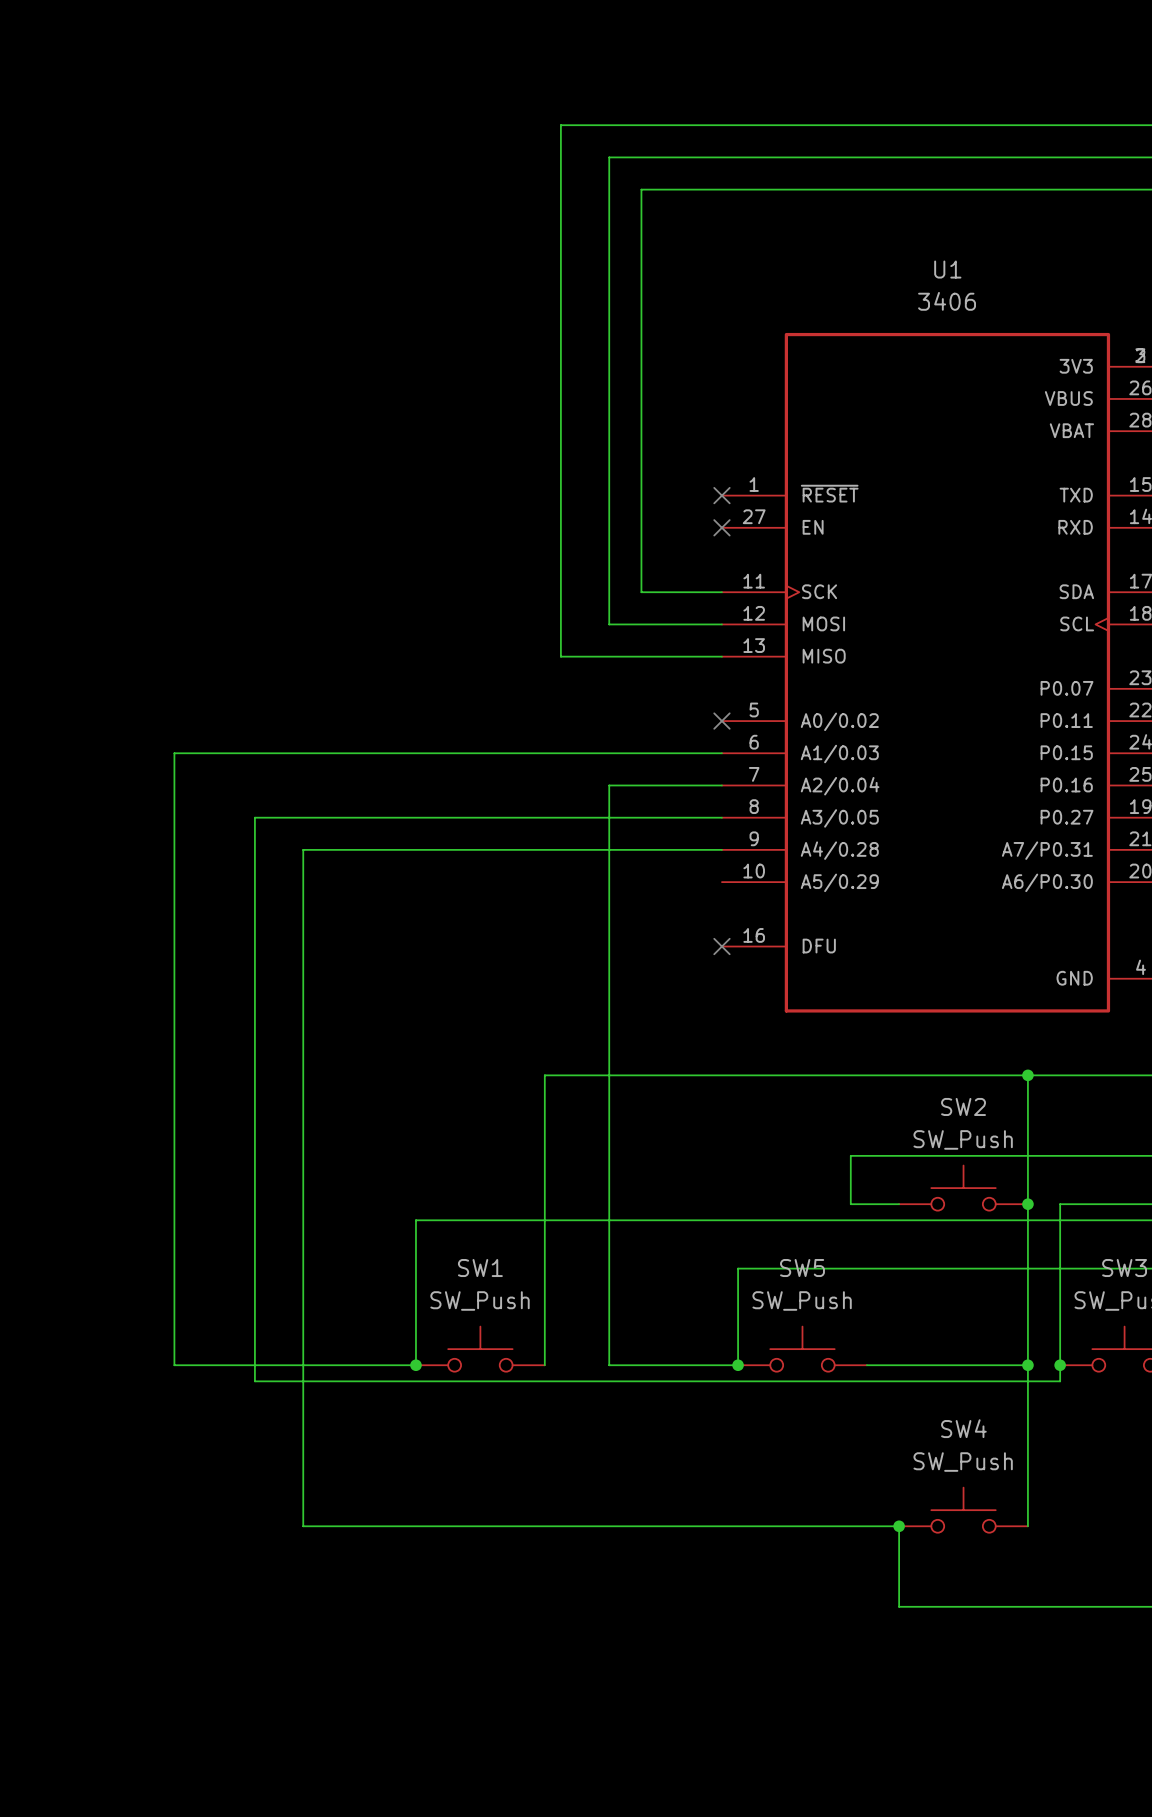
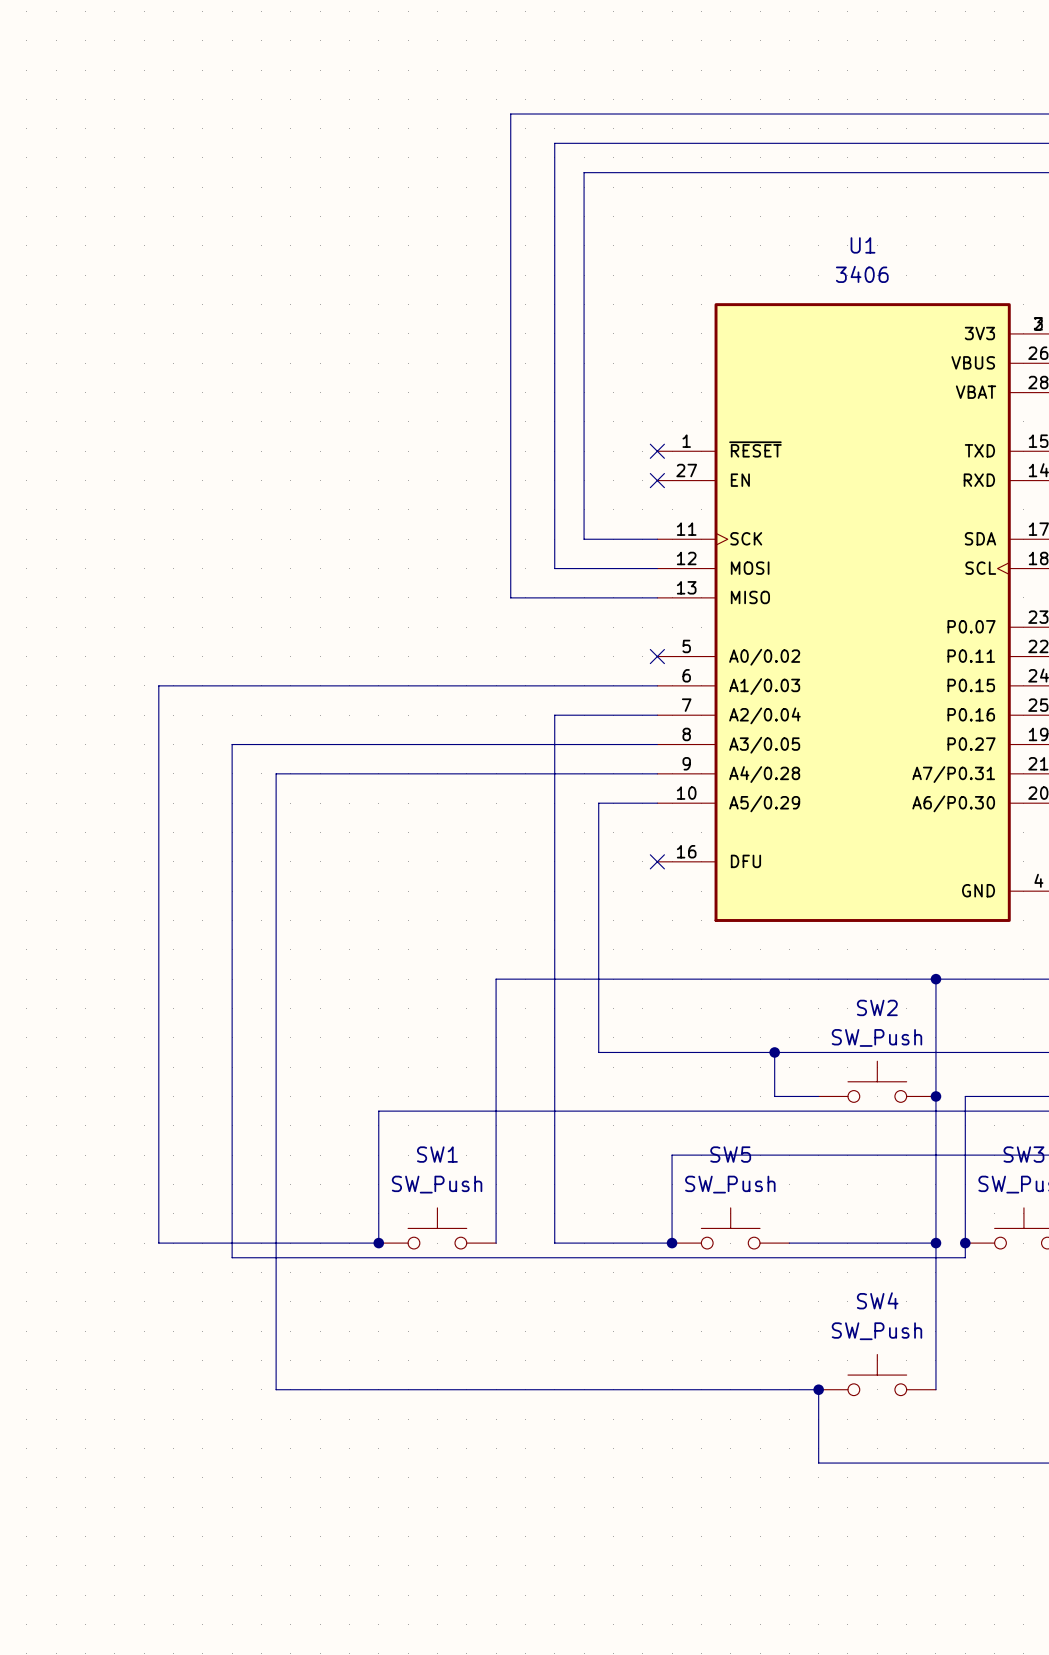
wire: none -> (657, 803) (598, 803) (598, 1052) (774, 1052)
junction: none -> (774, 1052)

